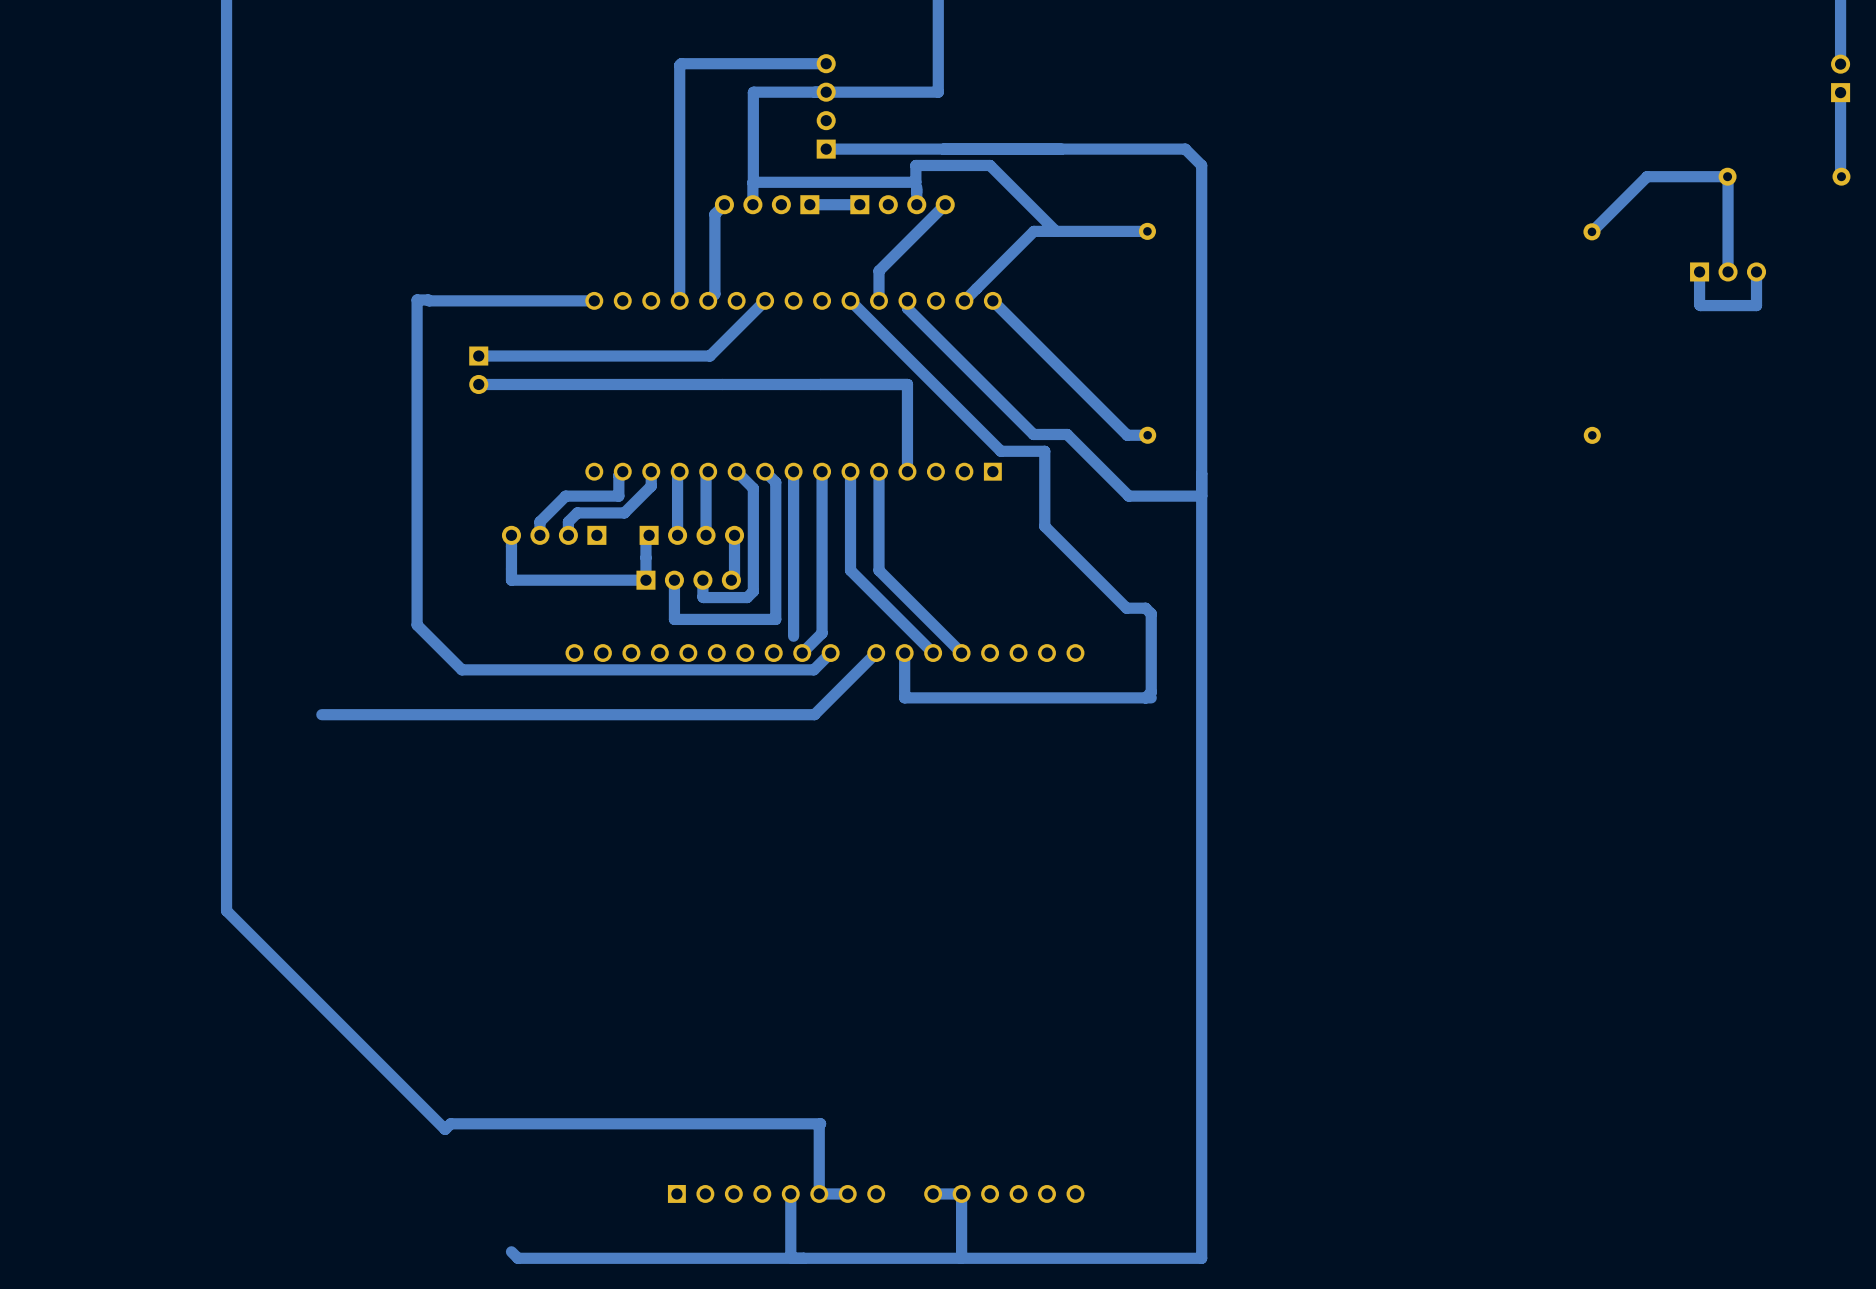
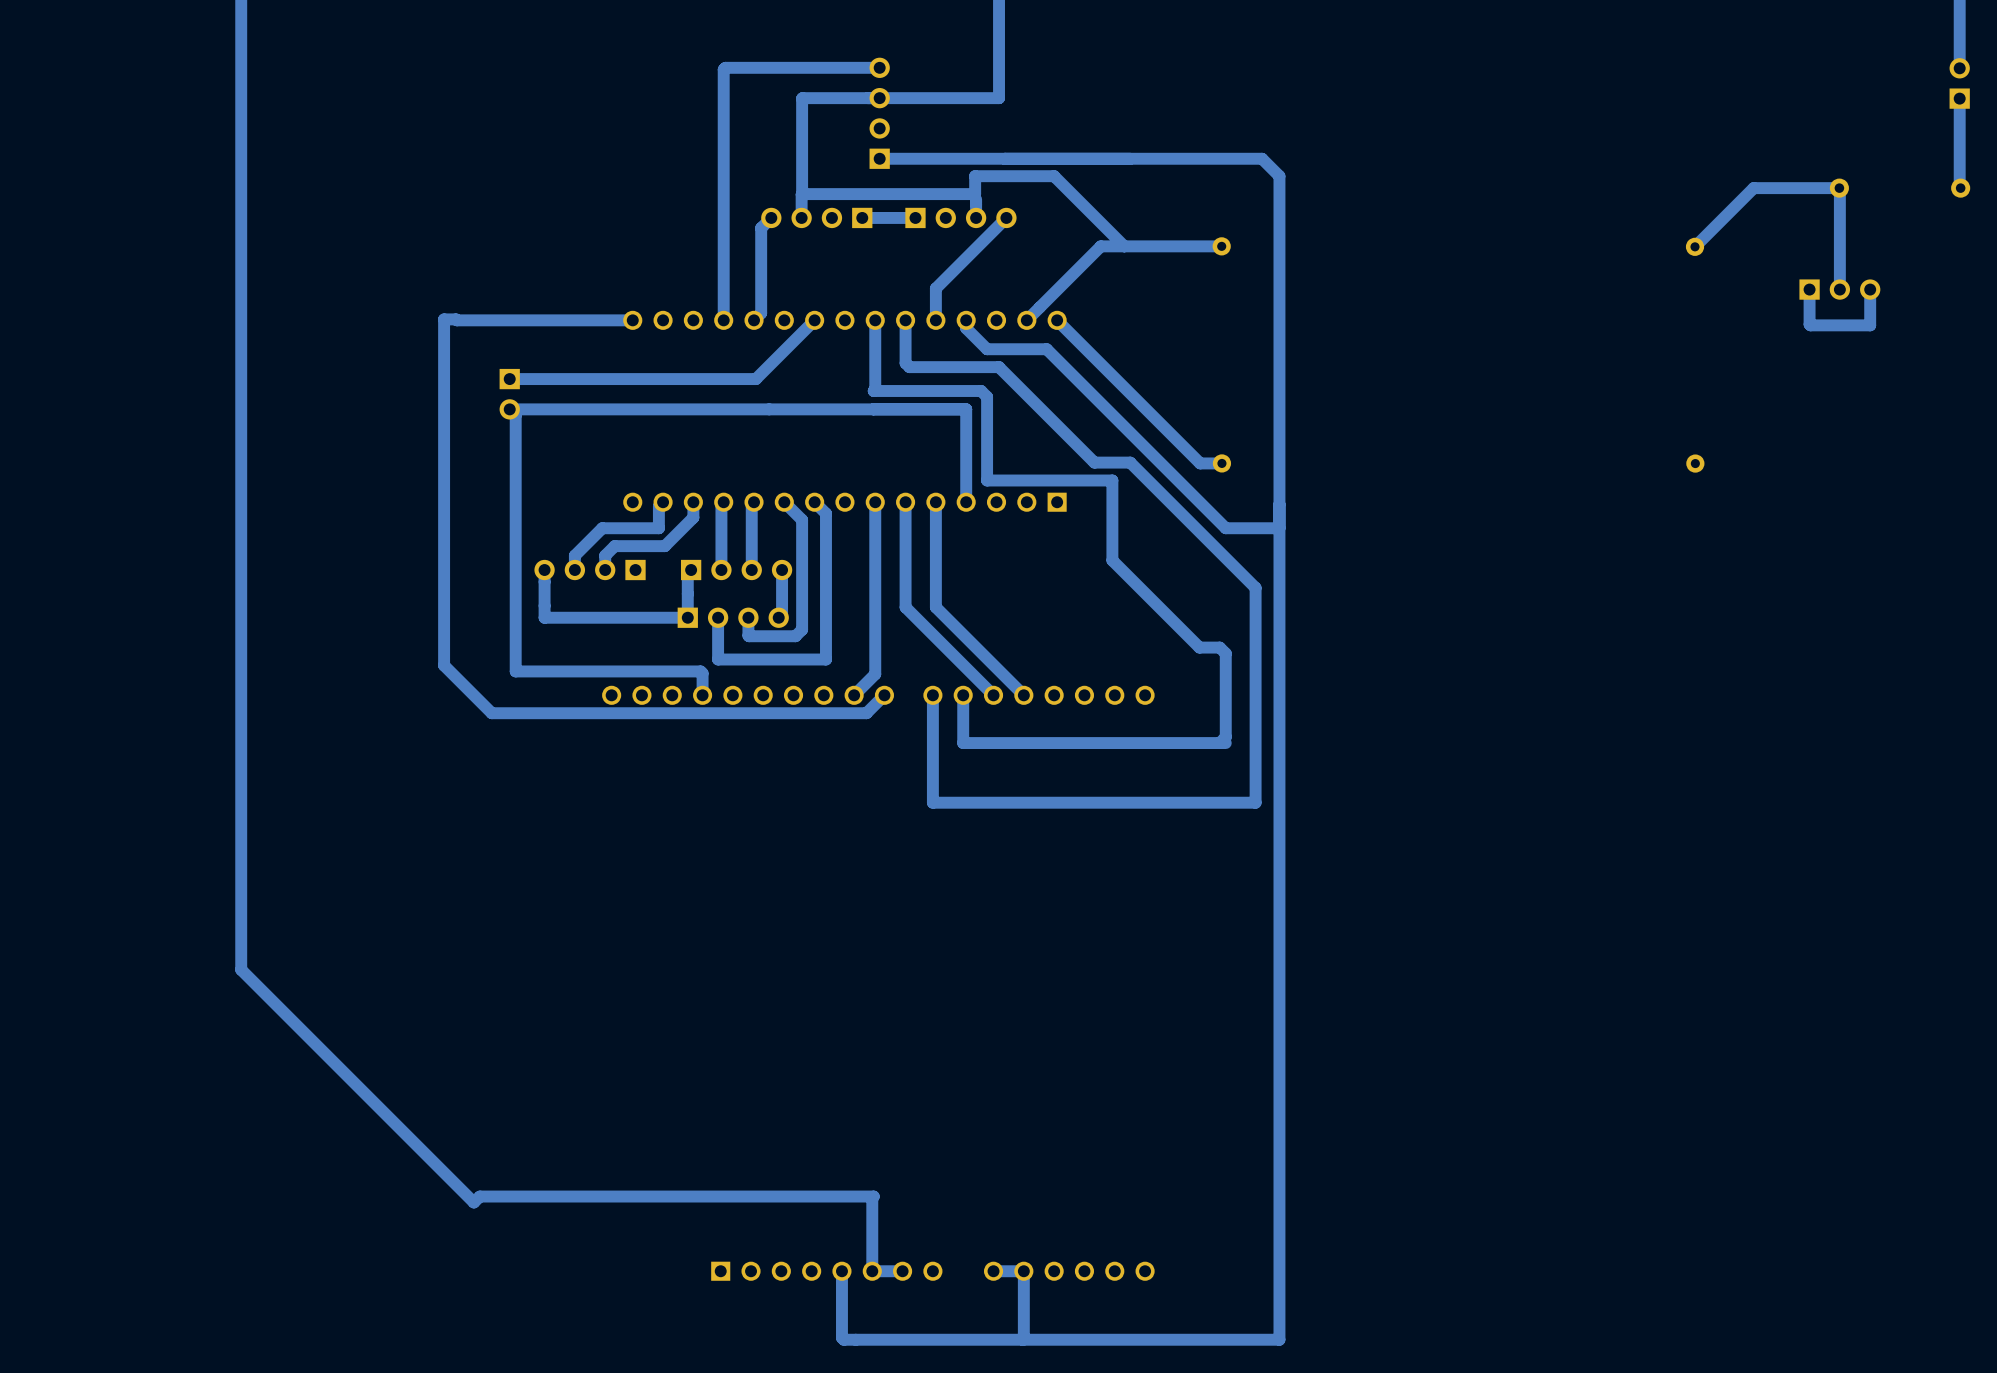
track: (850, 300) (1000, 451) -> (875, 320) (875, 389) (873, 390) (981, 390) (987, 396) (987, 480) (1065, 480)
track: (927, 328) (1033, 434) -> (905, 320) (905, 363) (909, 367) (999, 367) (1094, 462) (1100, 462)
track: none -> (509, 409) (515, 415) (515, 671) (700, 671) (702, 673) (702, 695)
track: (1061, 434) (1067, 434) (1128, 496) (1151, 496) -> (987, 349) (1046, 349) (1225, 528)
track: (793, 471) (793, 636) -> none
track: (876, 653) (814, 714) (321, 714) -> (932, 695) (932, 802) (1255, 802) (1255, 587) (1130, 462)
track: (511, 1251) (517, 1258) (792, 1258) -> none

